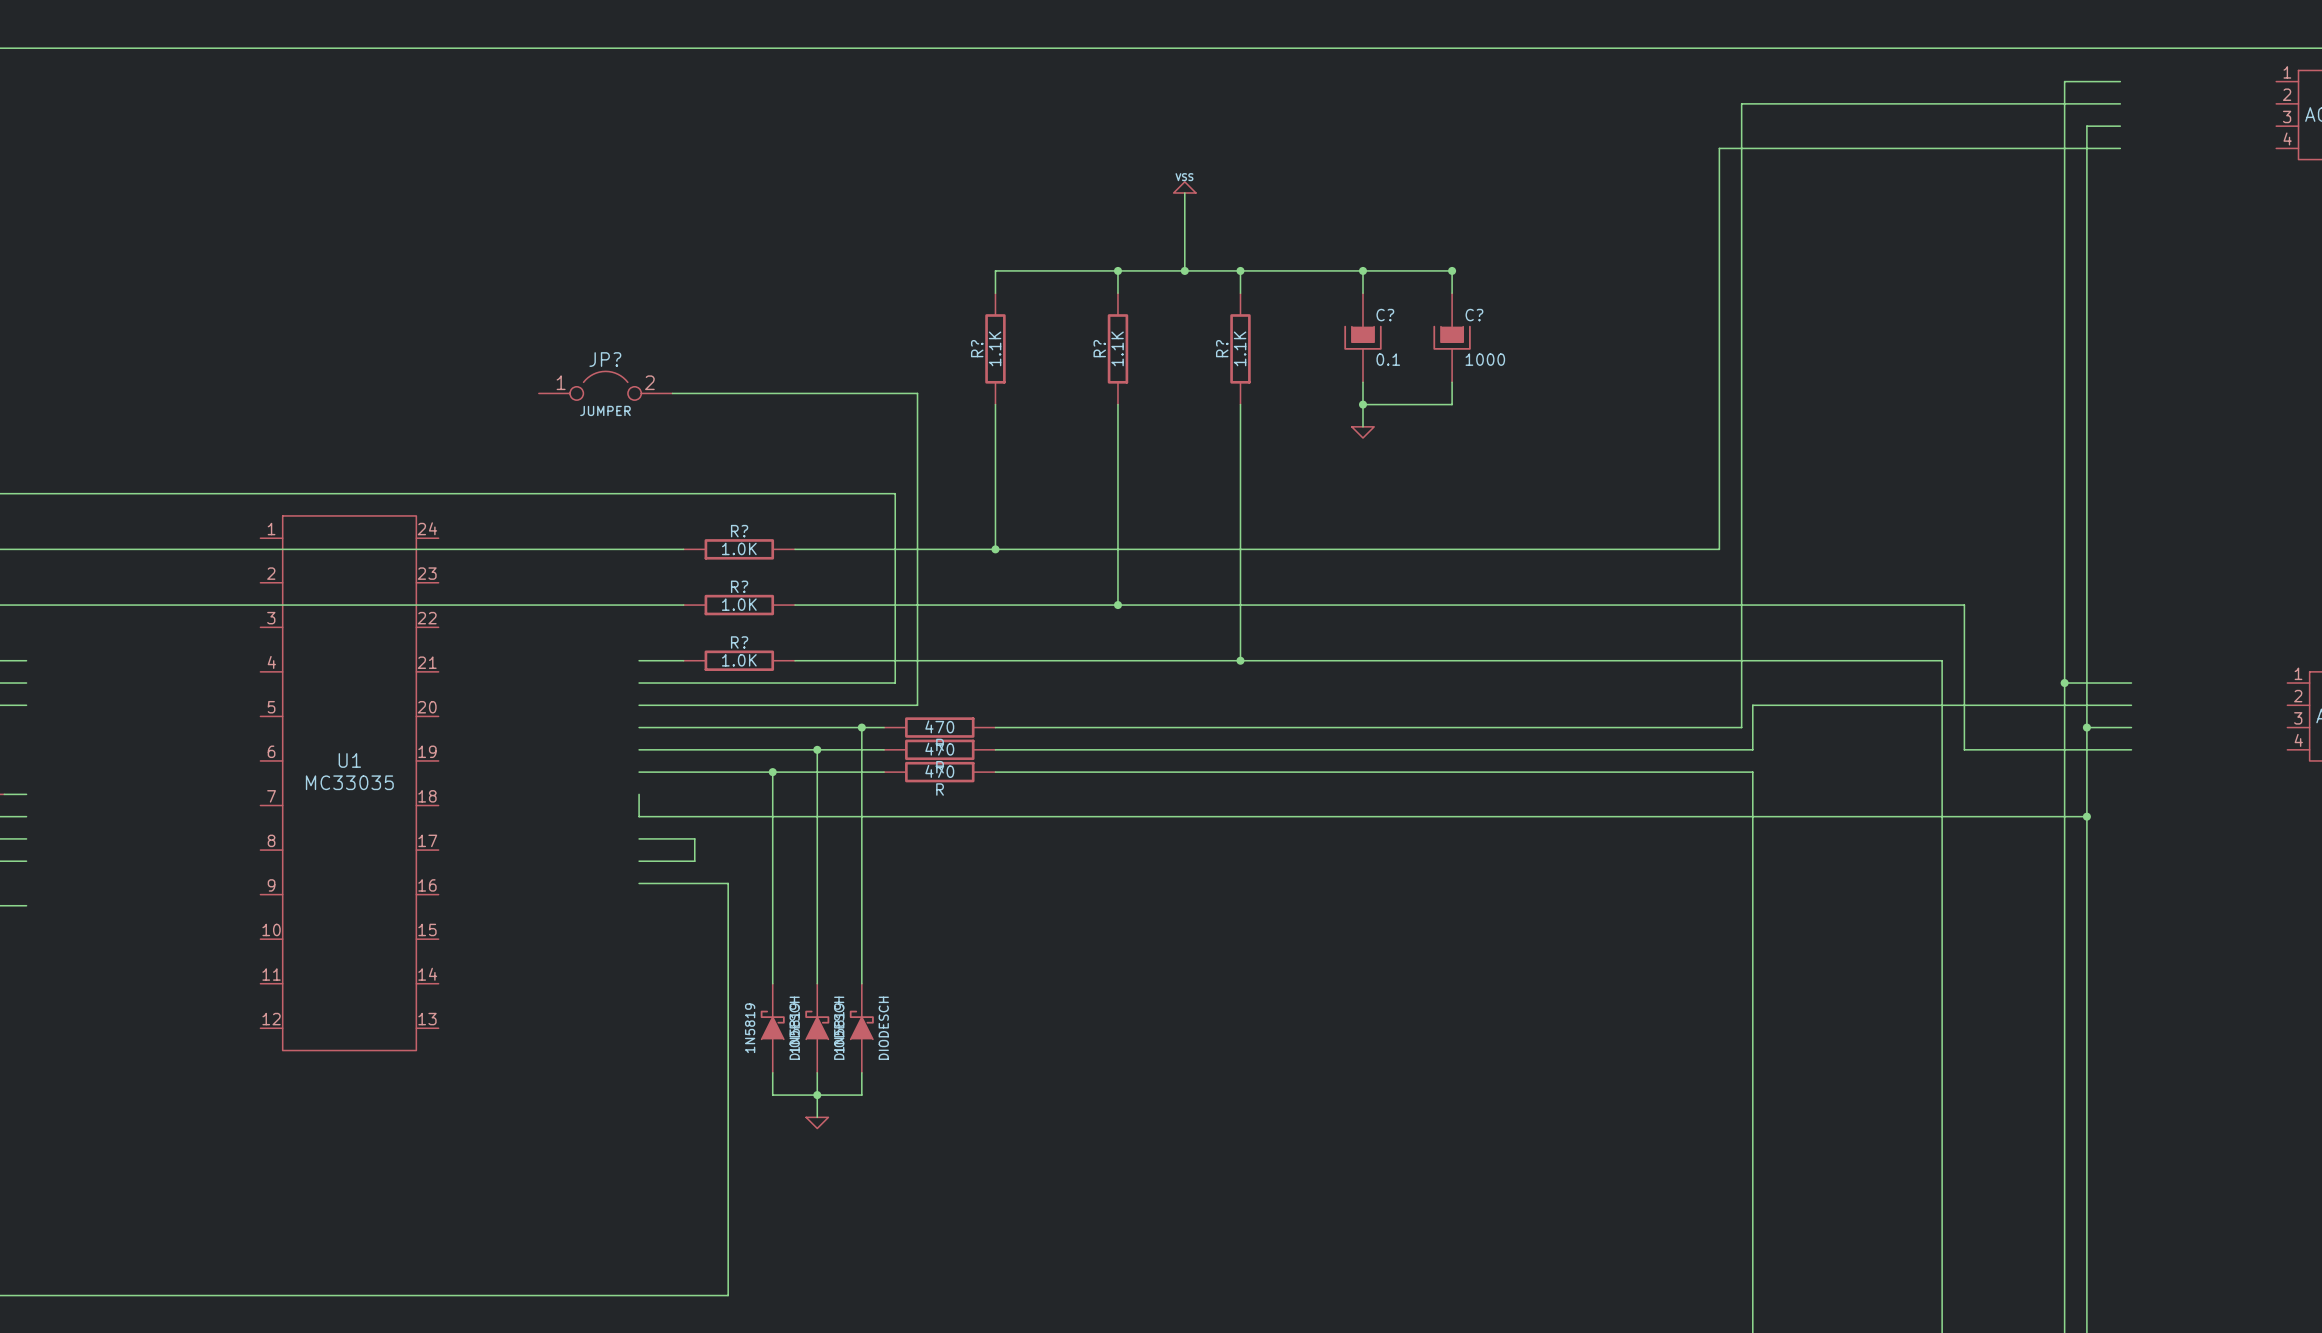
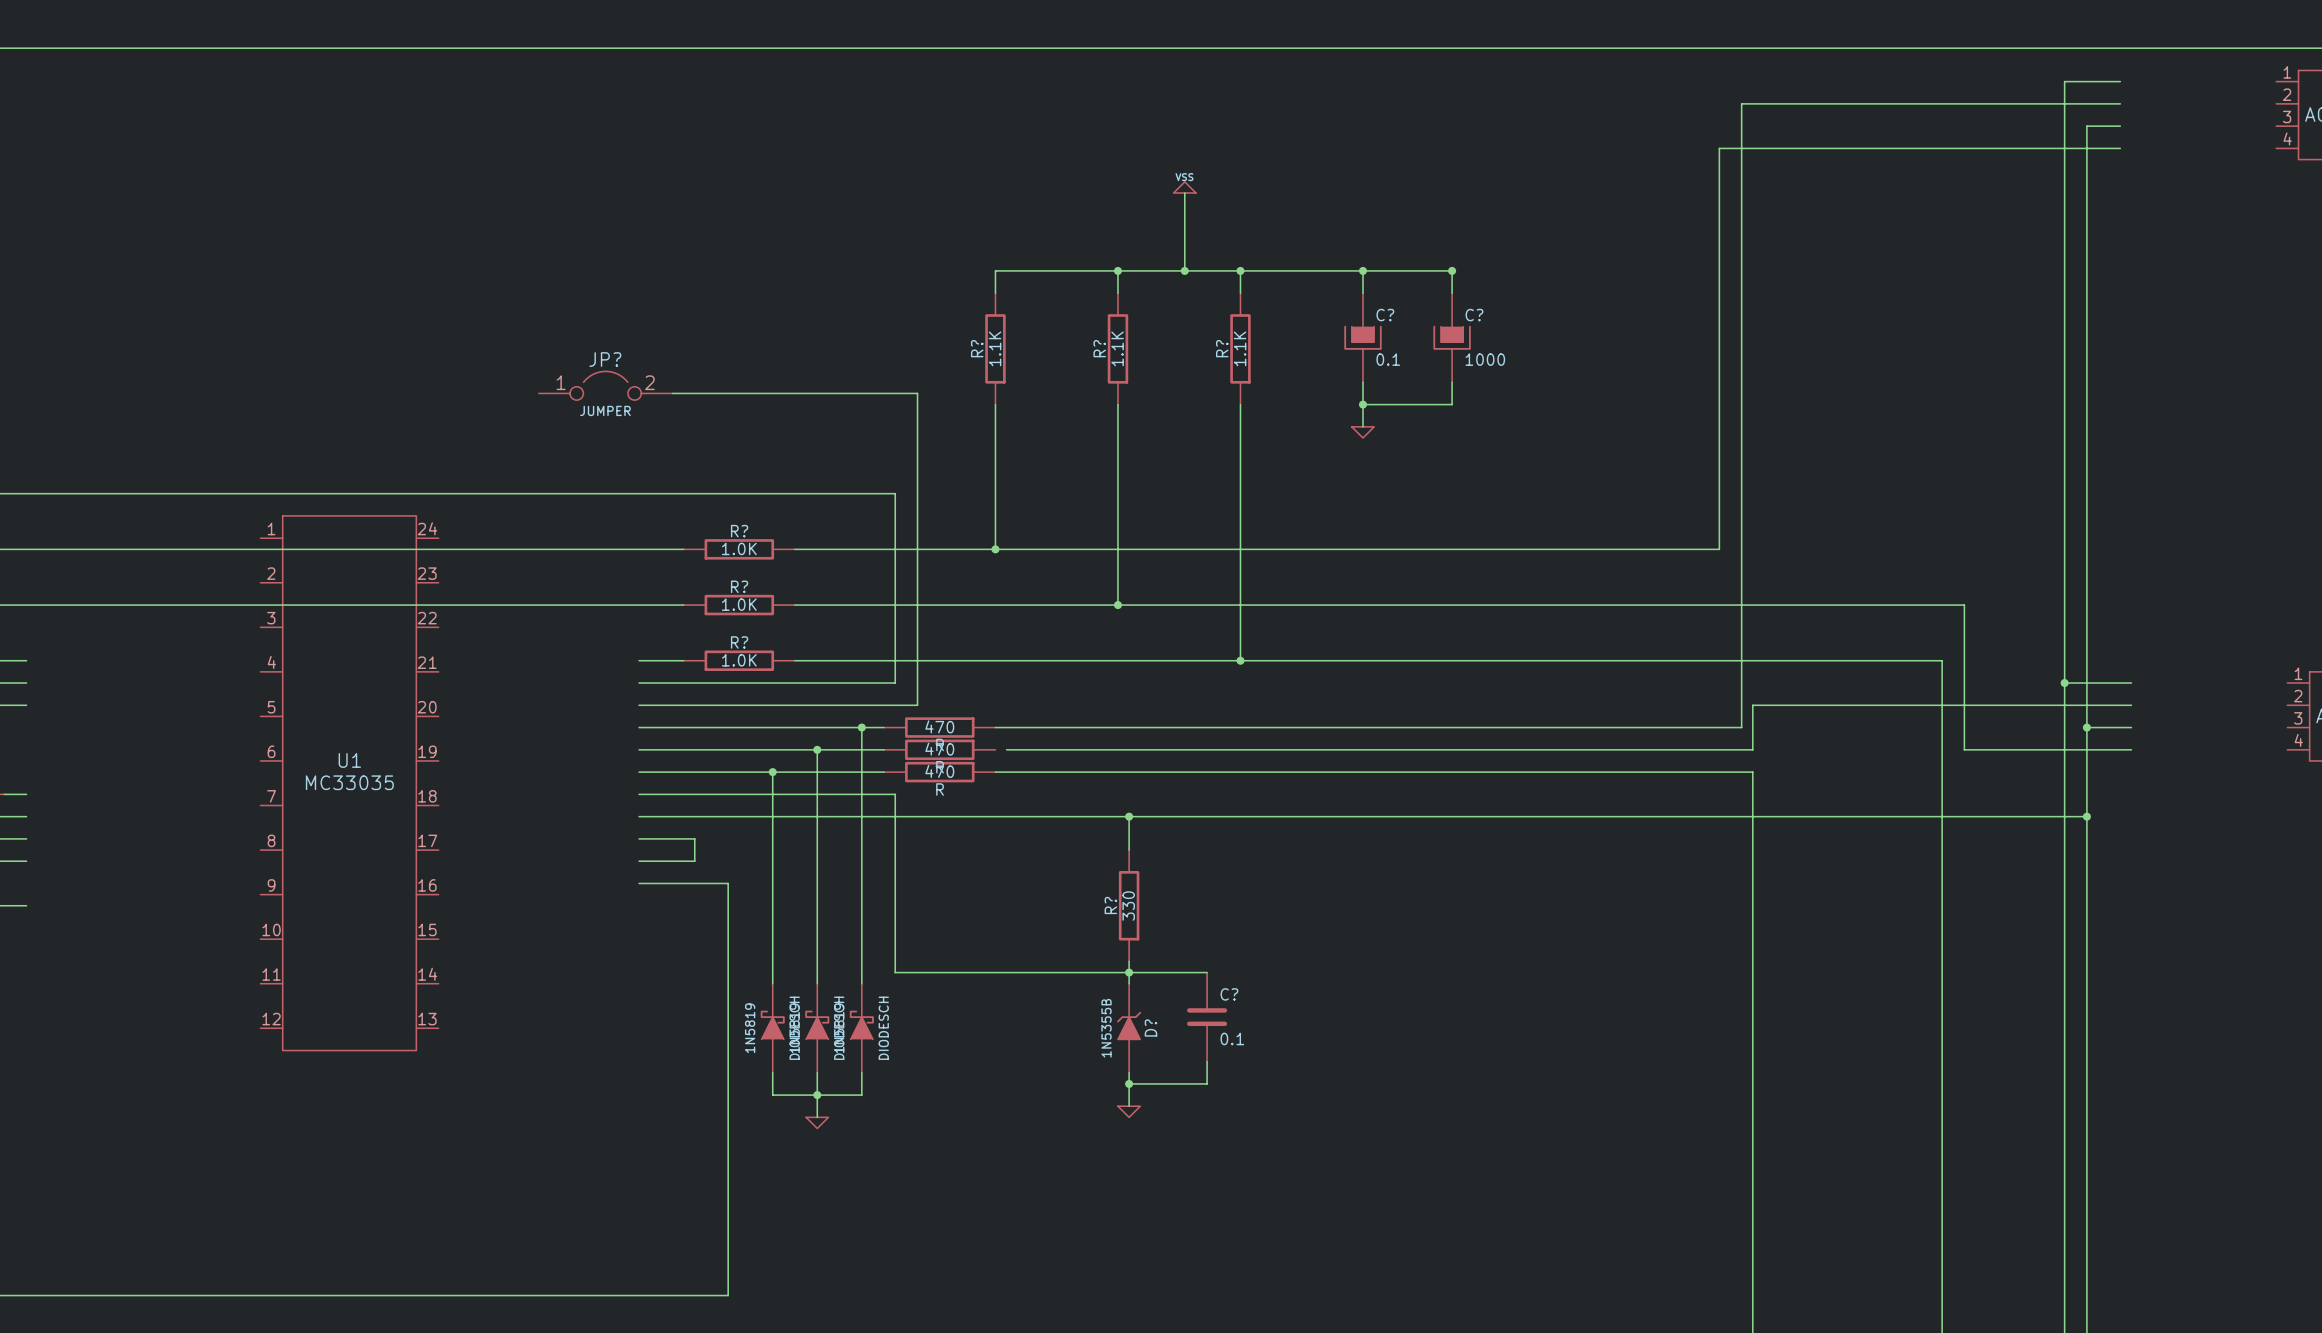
wire: (995, 749) (1006, 749) -> none
wire: (639, 794) (639, 816) -> (639, 794) (895, 794) (895, 972) (1207, 972)
wire: none -> (1129, 816) (1129, 850)
junction: none -> (1129, 816)
R?: none -> 330 (1129, 905)
wire: none -> (1129, 961) (1129, 983)
junction: none -> (1129, 972)
C?: none -> 0.1 (1207, 1017)
D?: none -> 1N5355B (1129, 1028)
wire: none -> (1207, 1061) (1207, 1083) (1129, 1083)
wire: none -> (1129, 1072) (1129, 1106)
junction: none -> (1129, 1083)
power symbol: none -> (1129, 1111)

